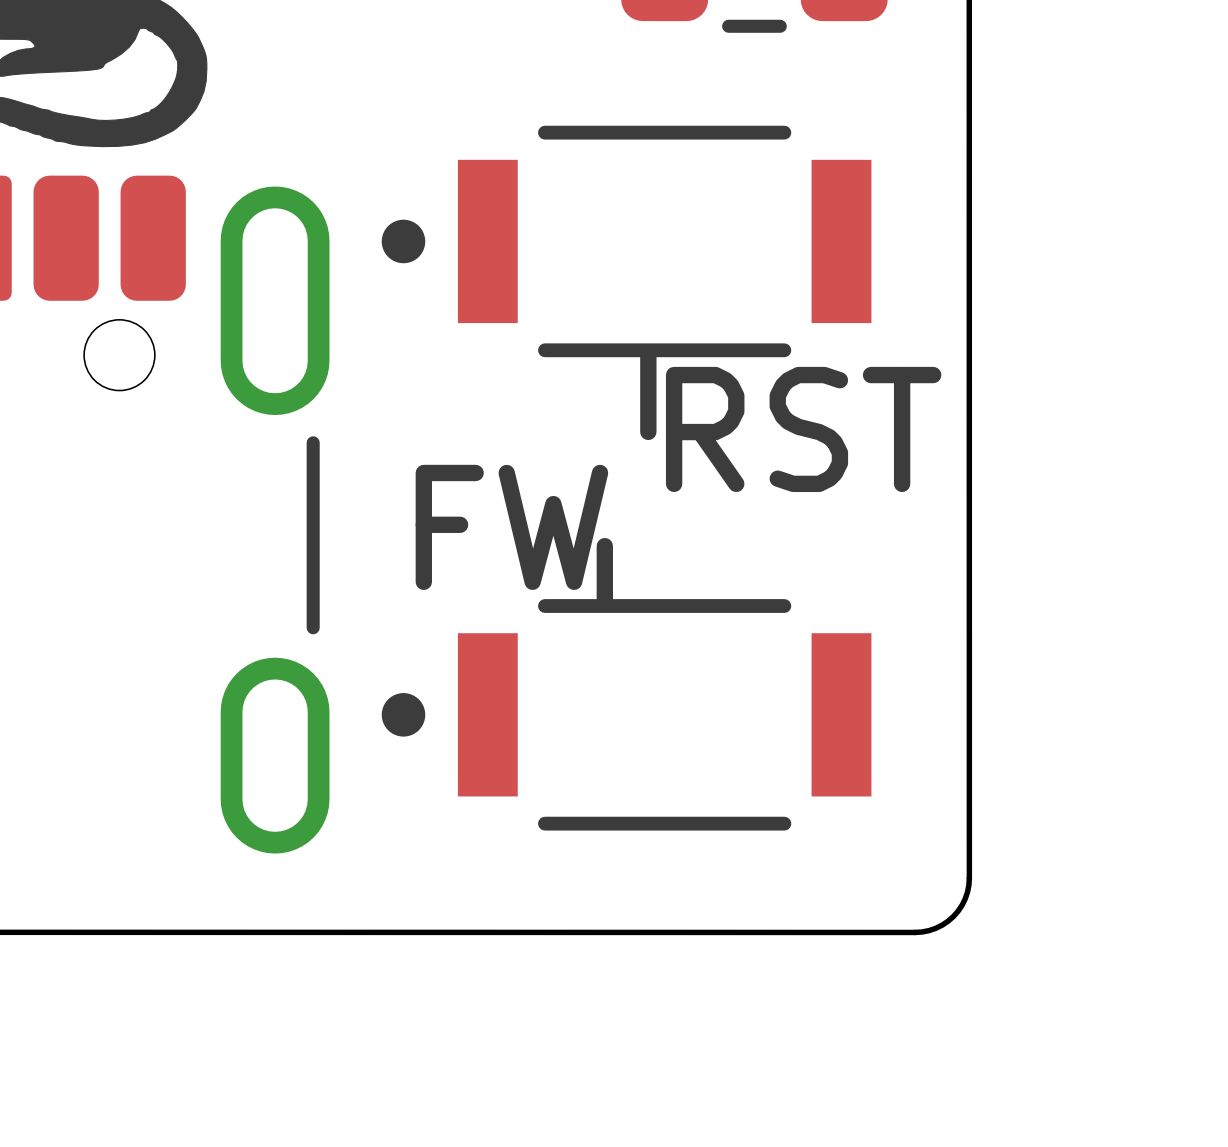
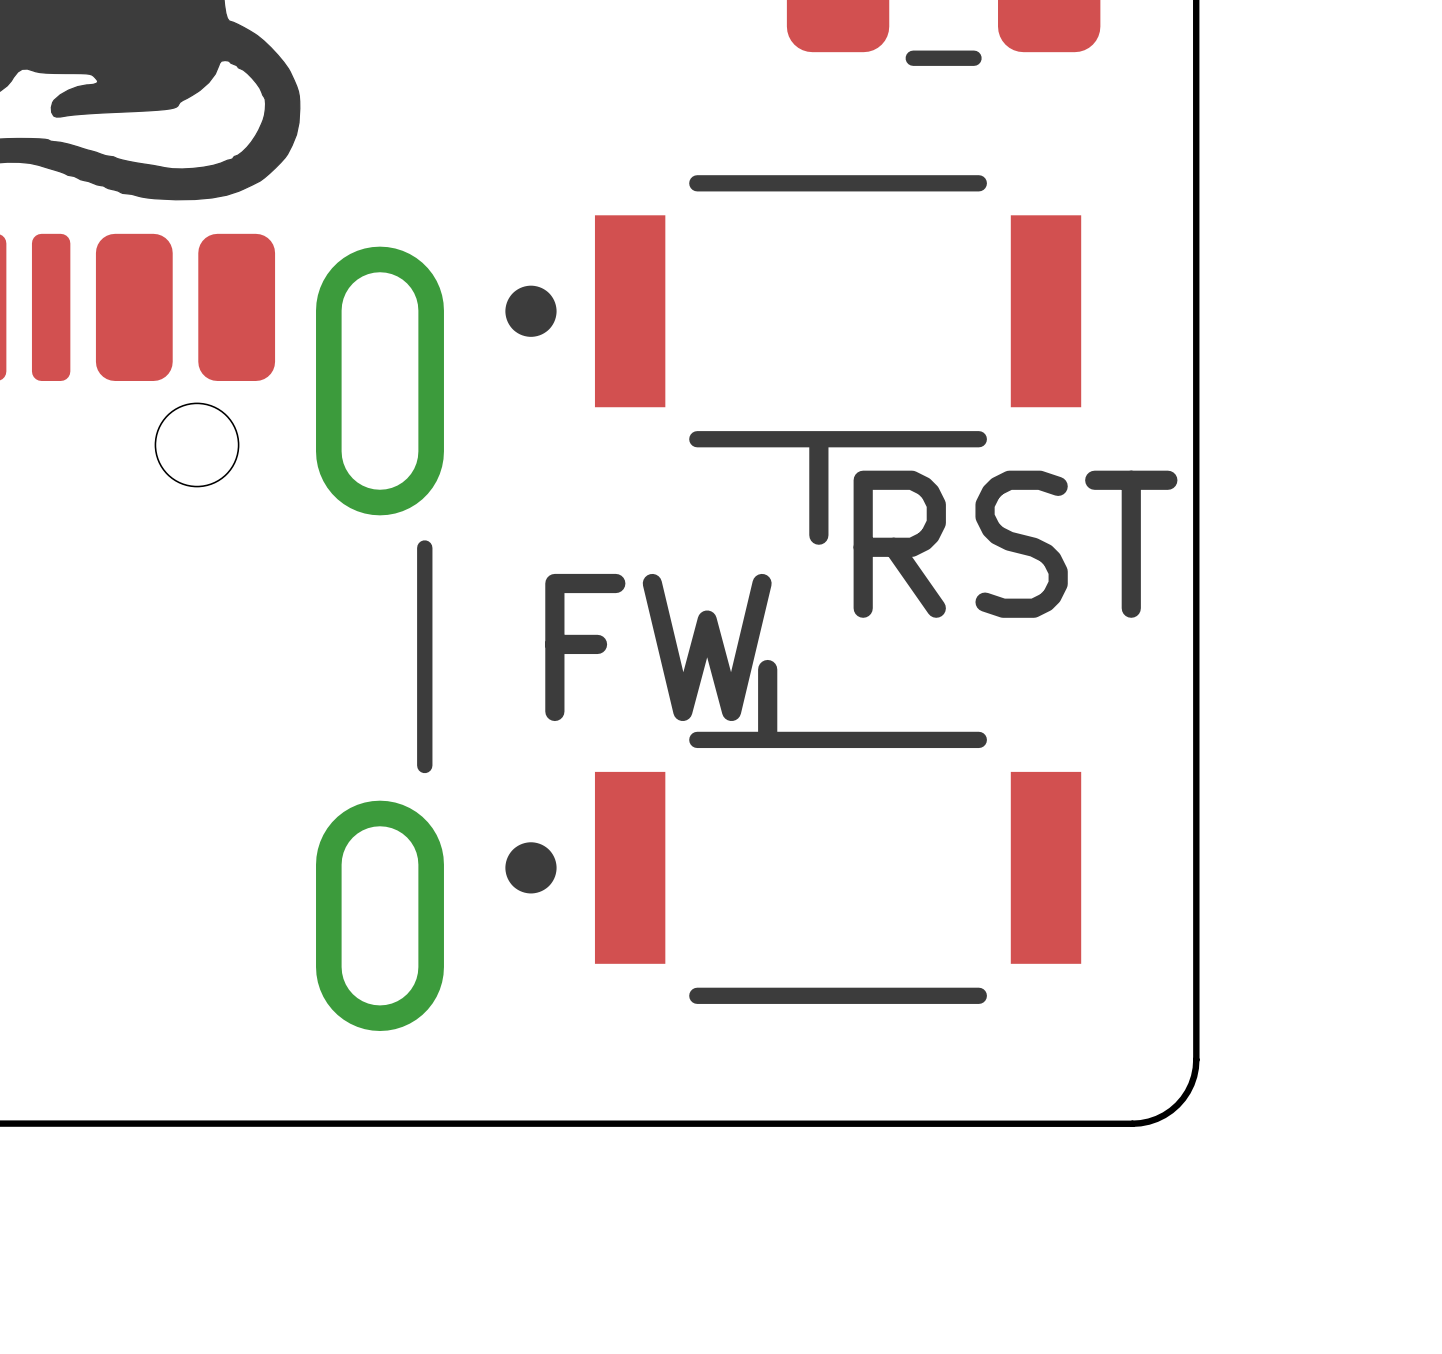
text position: RST (803, 429) -> RST (1015, 544)

